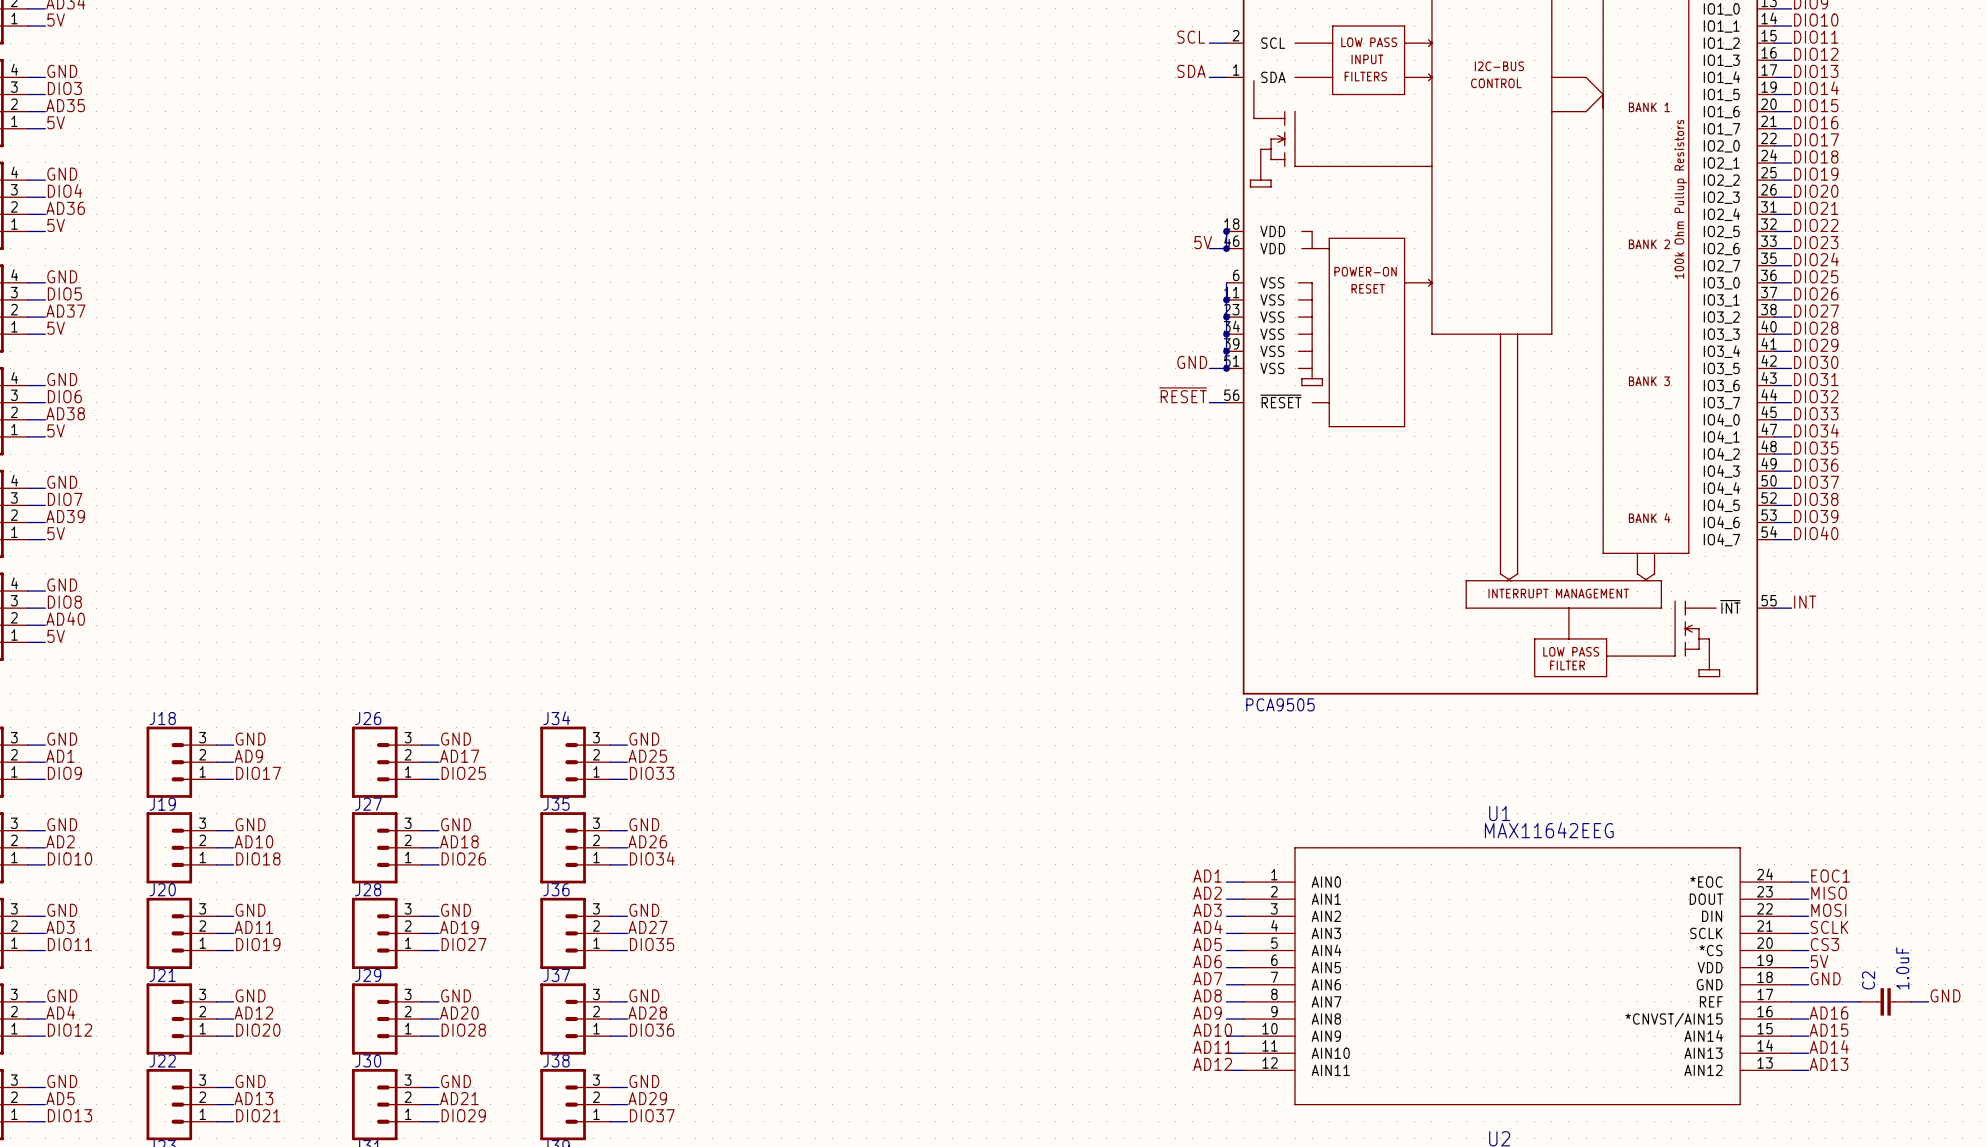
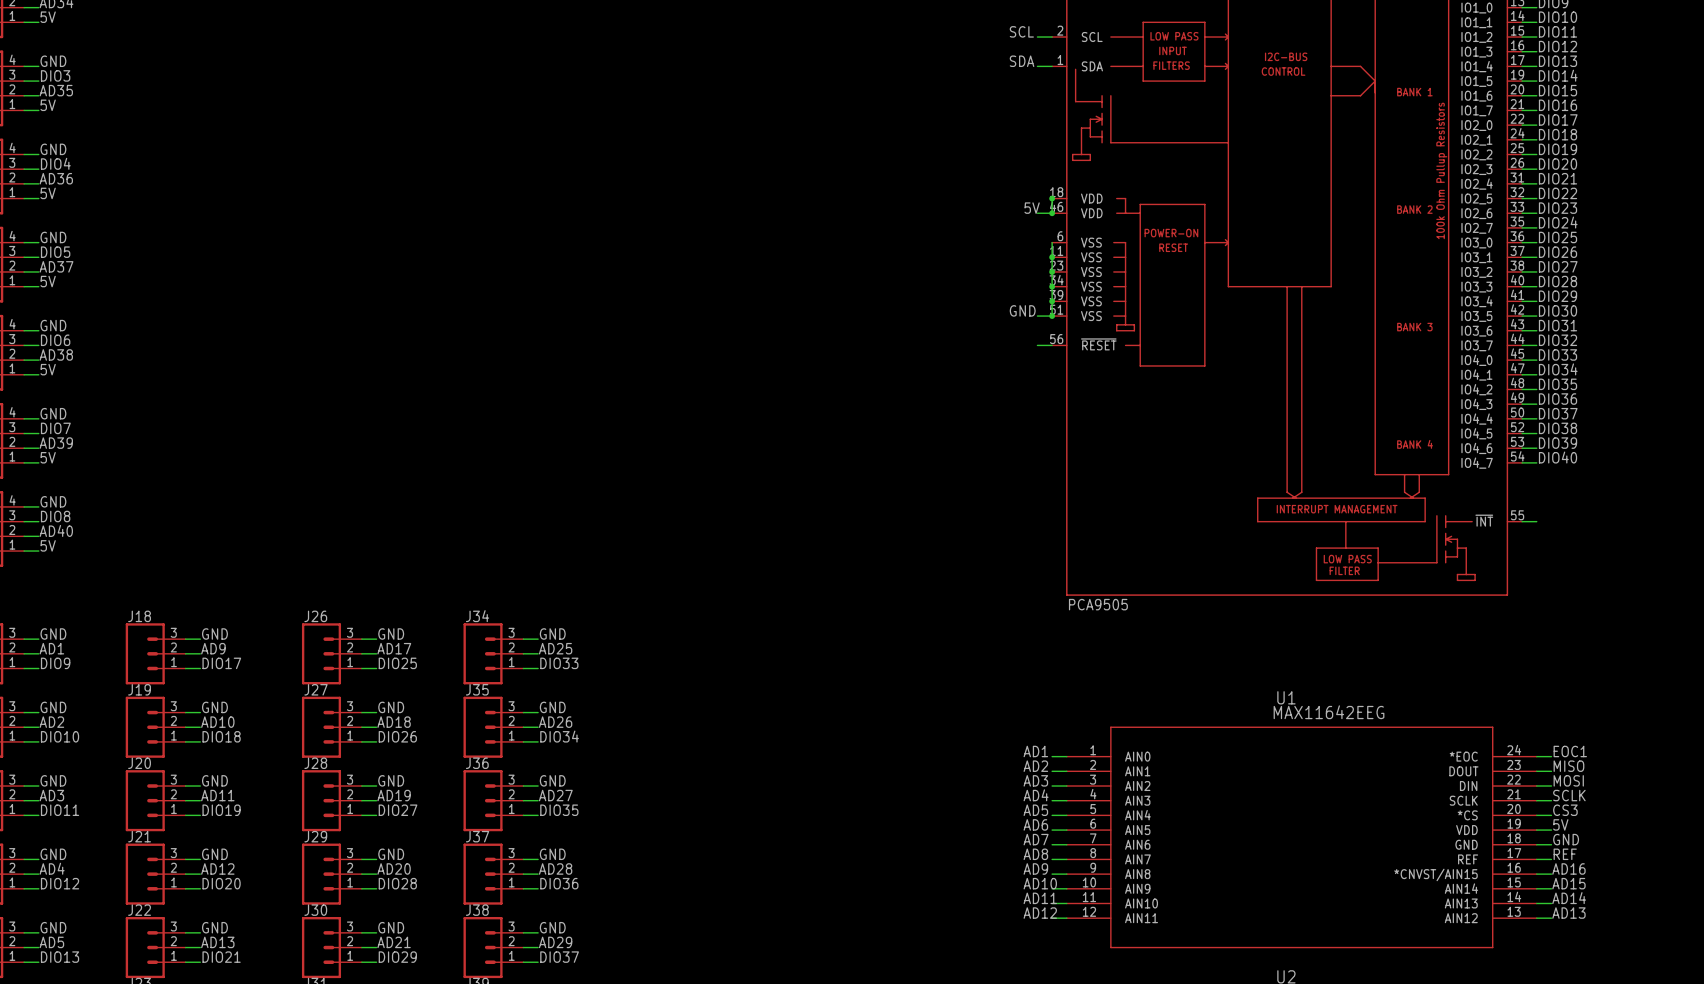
label: ~{RESET} (1183, 395) -> none
label: INT (1805, 602) -> none
label: none -> REF (1565, 854)
label: GND (1945, 995) -> none
wire: (1808, 1001) (1859, 1001) -> none
C2: 1.0uF (1885, 1001) -> none
wire: (1911, 1001) (1928, 1001) -> none

